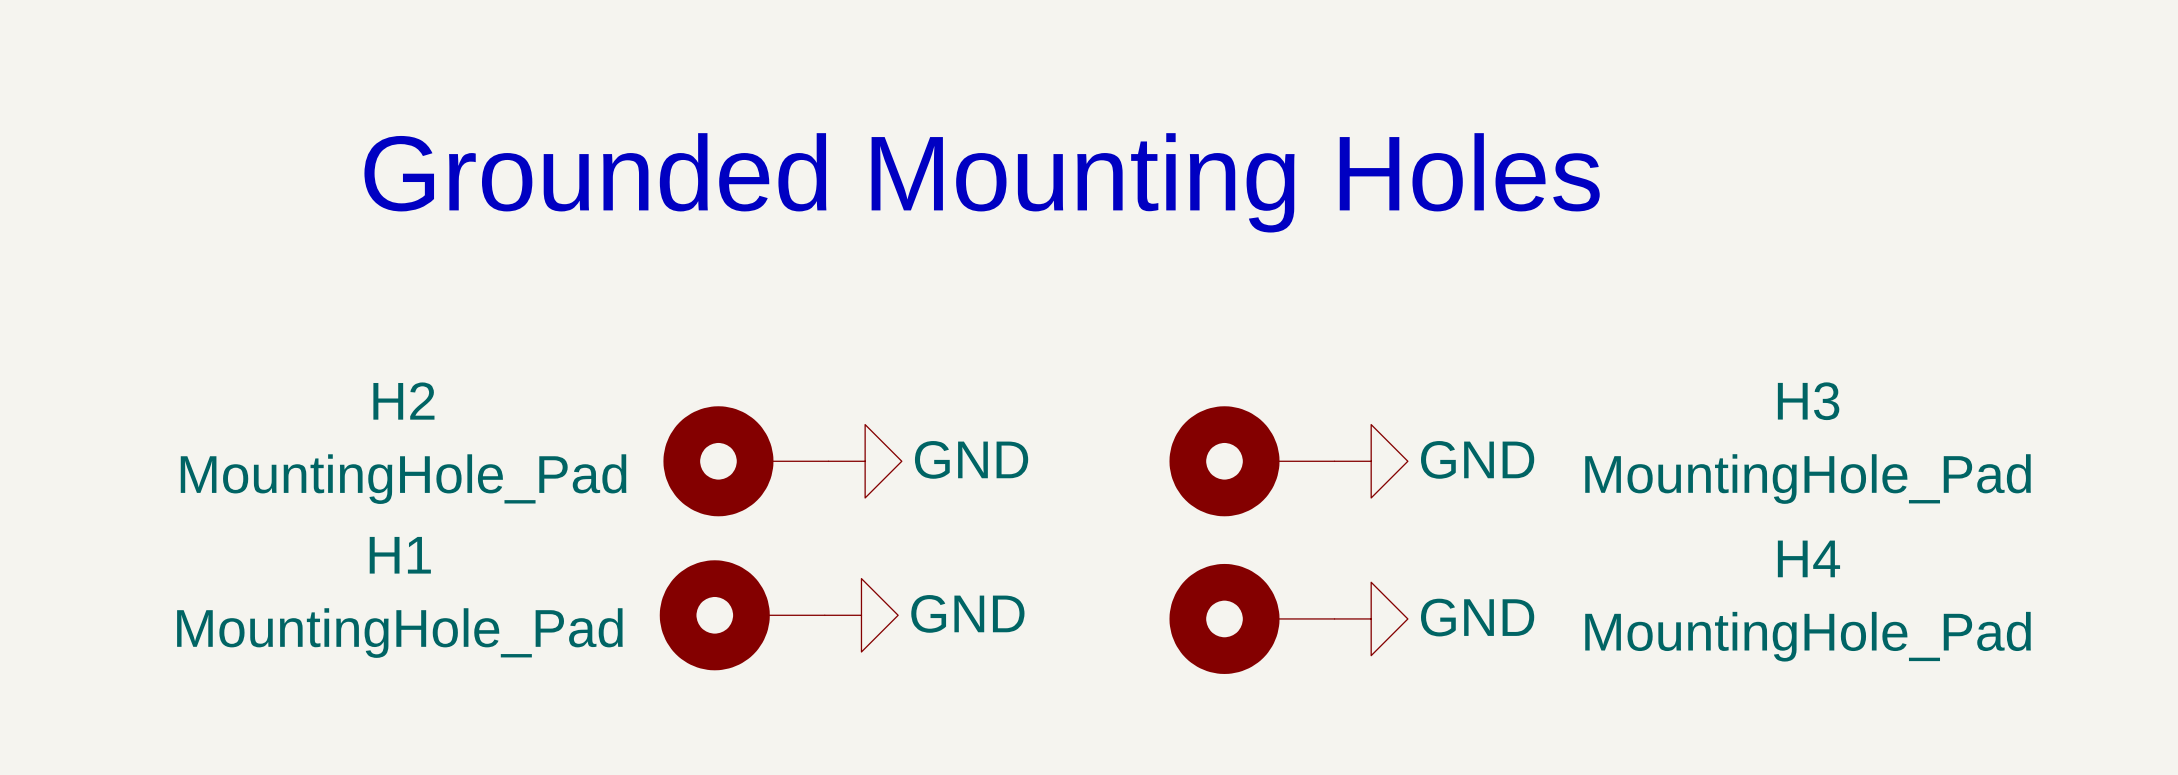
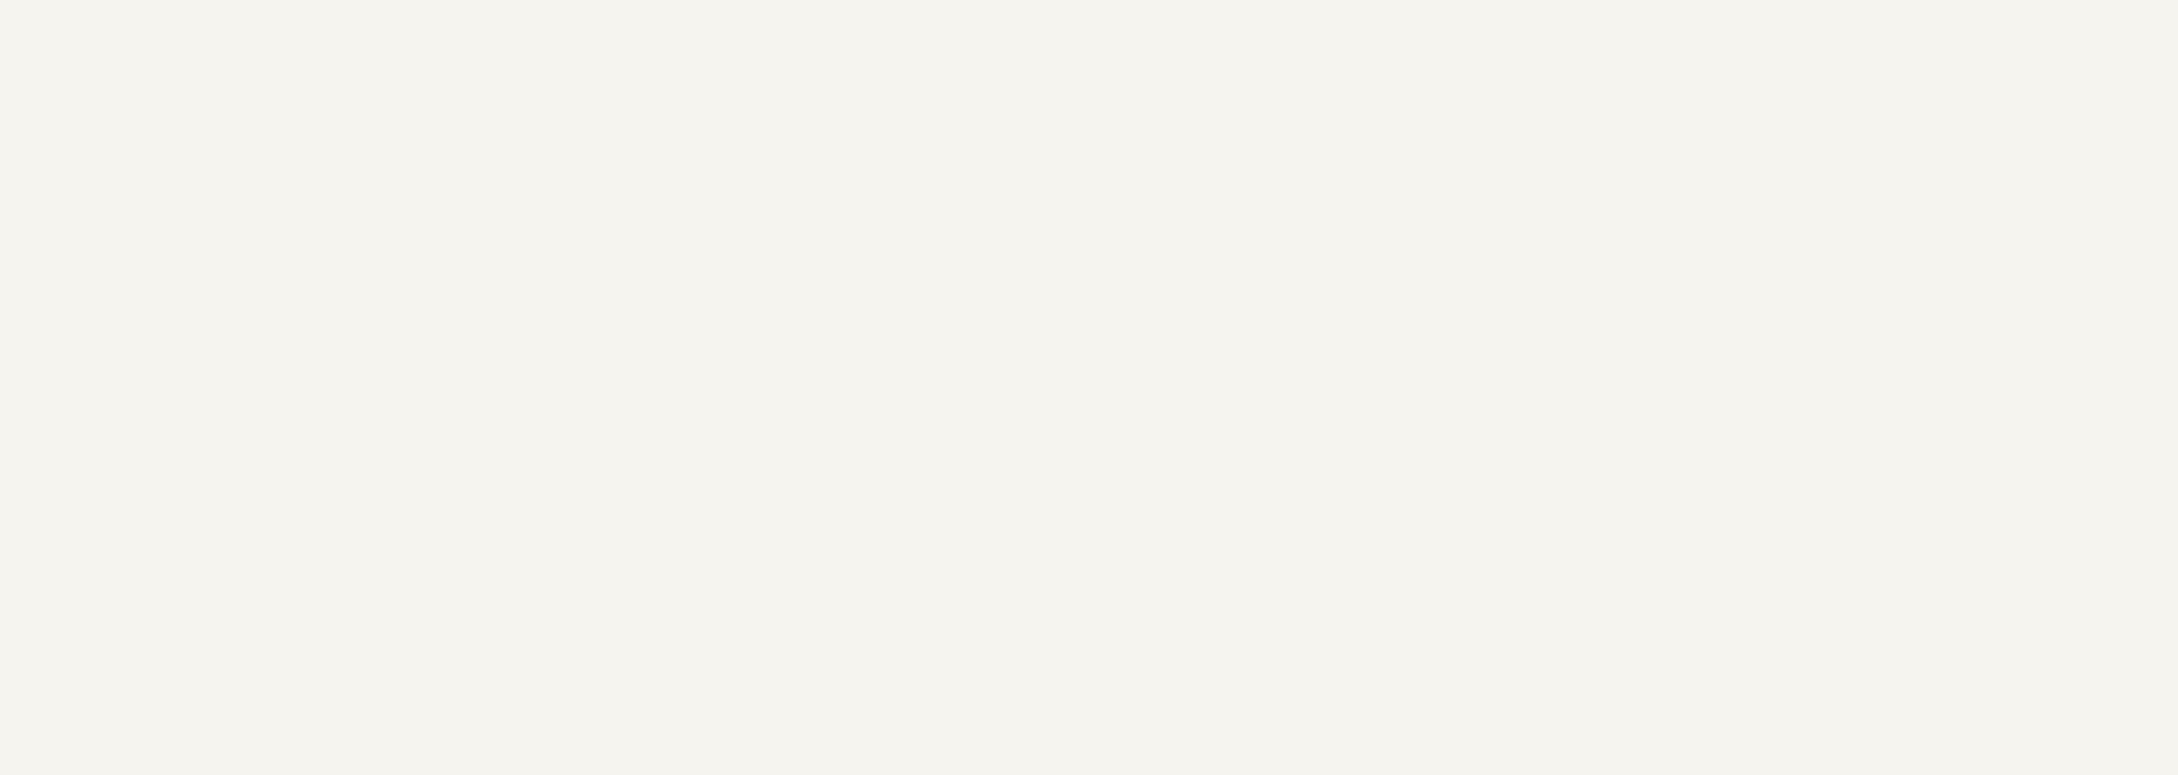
text: Grounded Mounting Holes (982, 182) -> none
H2: MountingHole_Pad (745, 461) -> none
power symbol: GND (865, 461) -> none
H3: MountingHole_Pad (1252, 461) -> none
power symbol: GND (1371, 461) -> none
H1: MountingHole_Pad (742, 615) -> none
power symbol: GND (861, 615) -> none
H4: MountingHole_Pad (1252, 618) -> none
power symbol: GND (1371, 618) -> none

